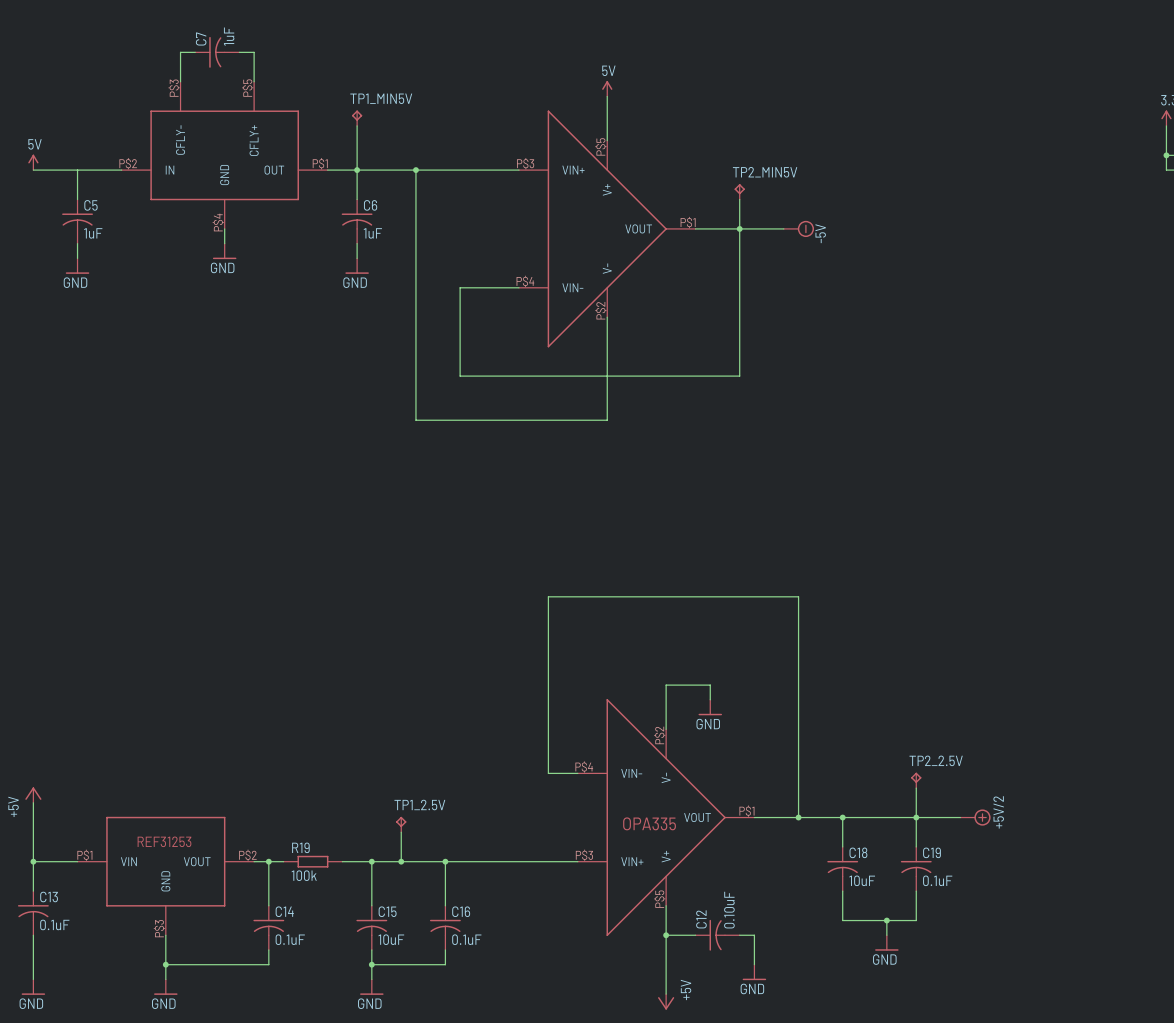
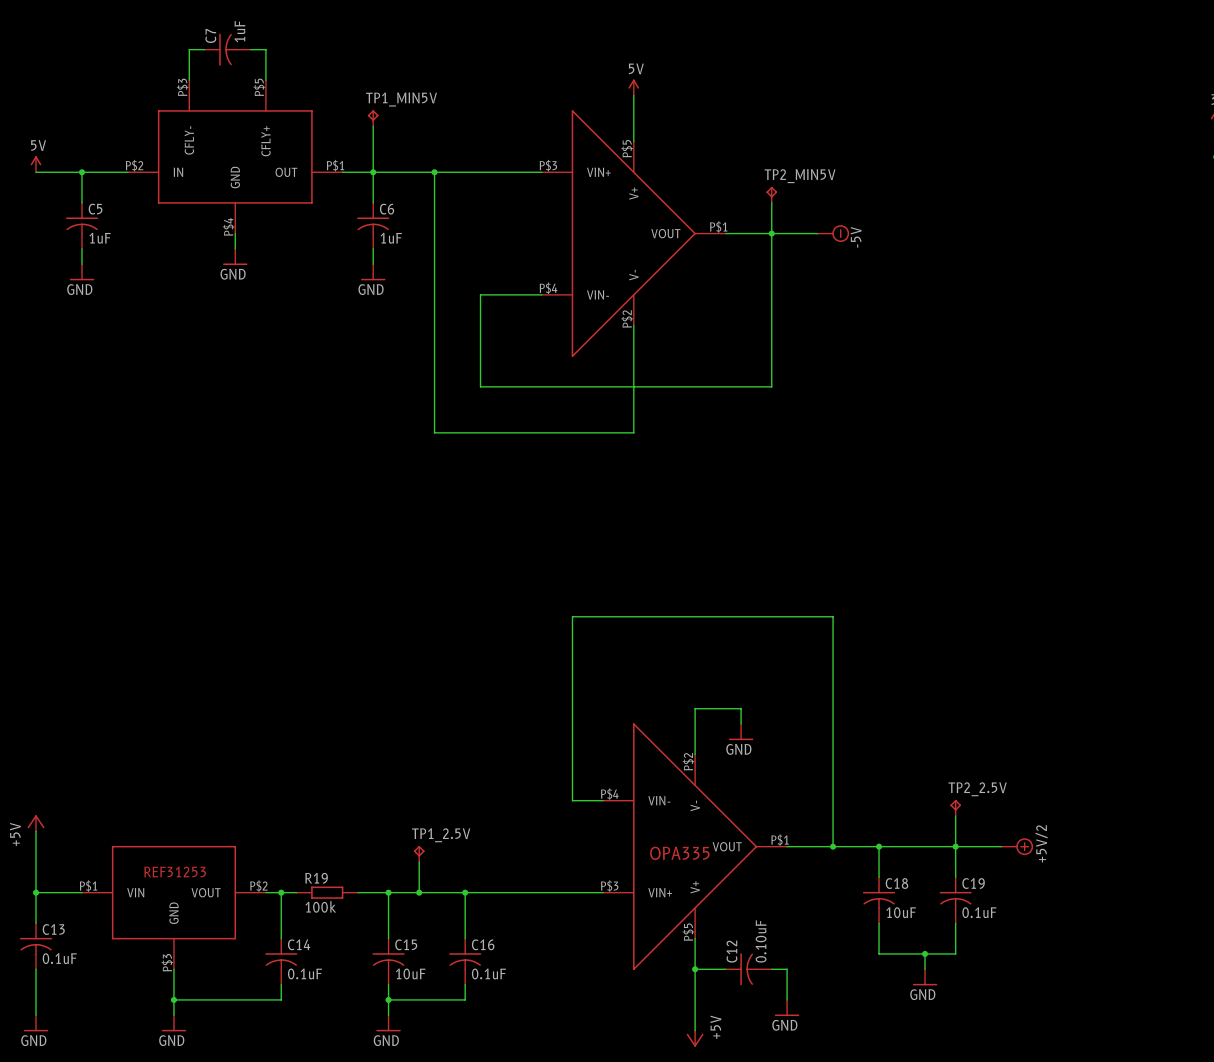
junction: none -> (82, 172)

